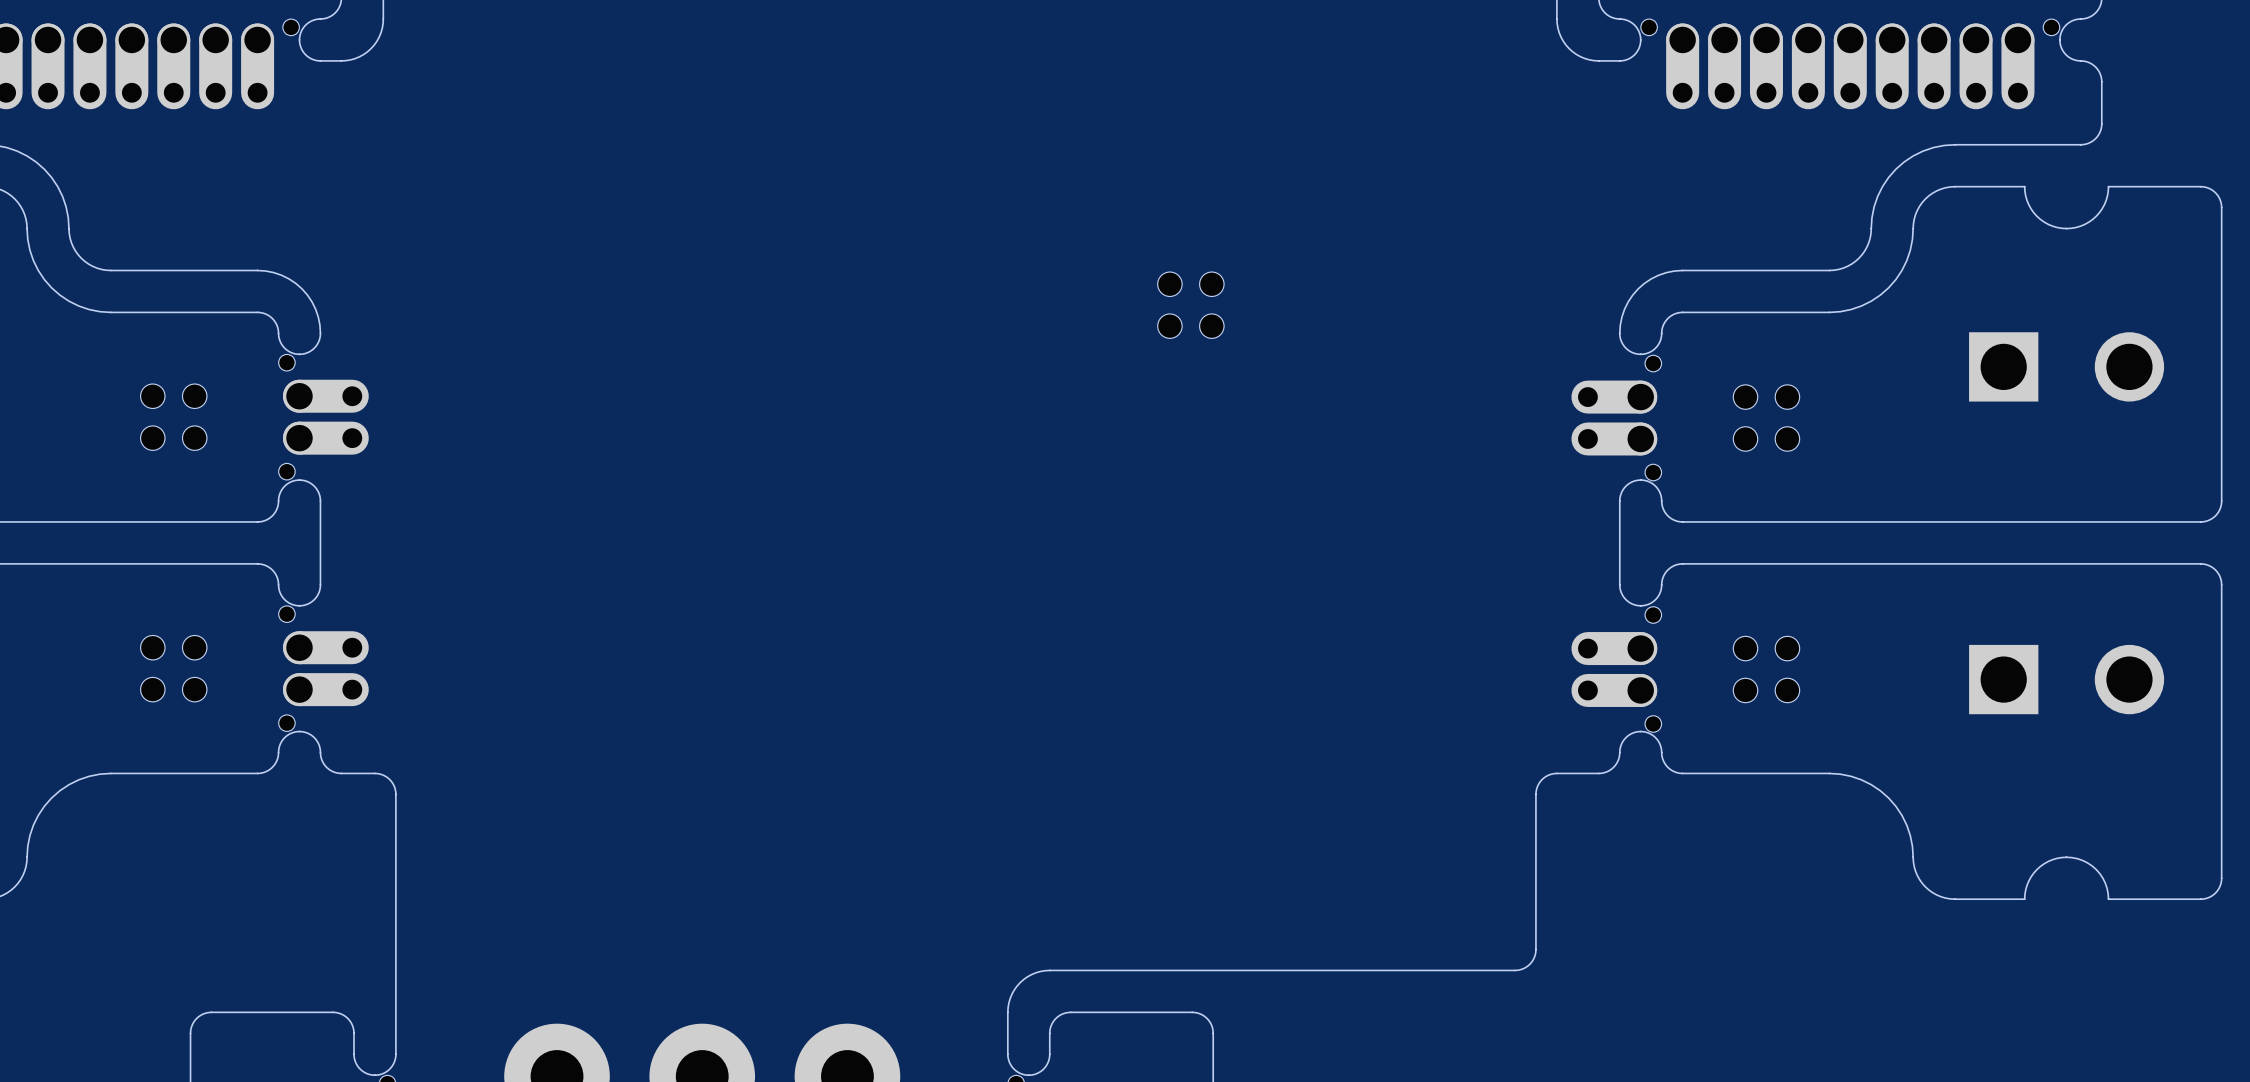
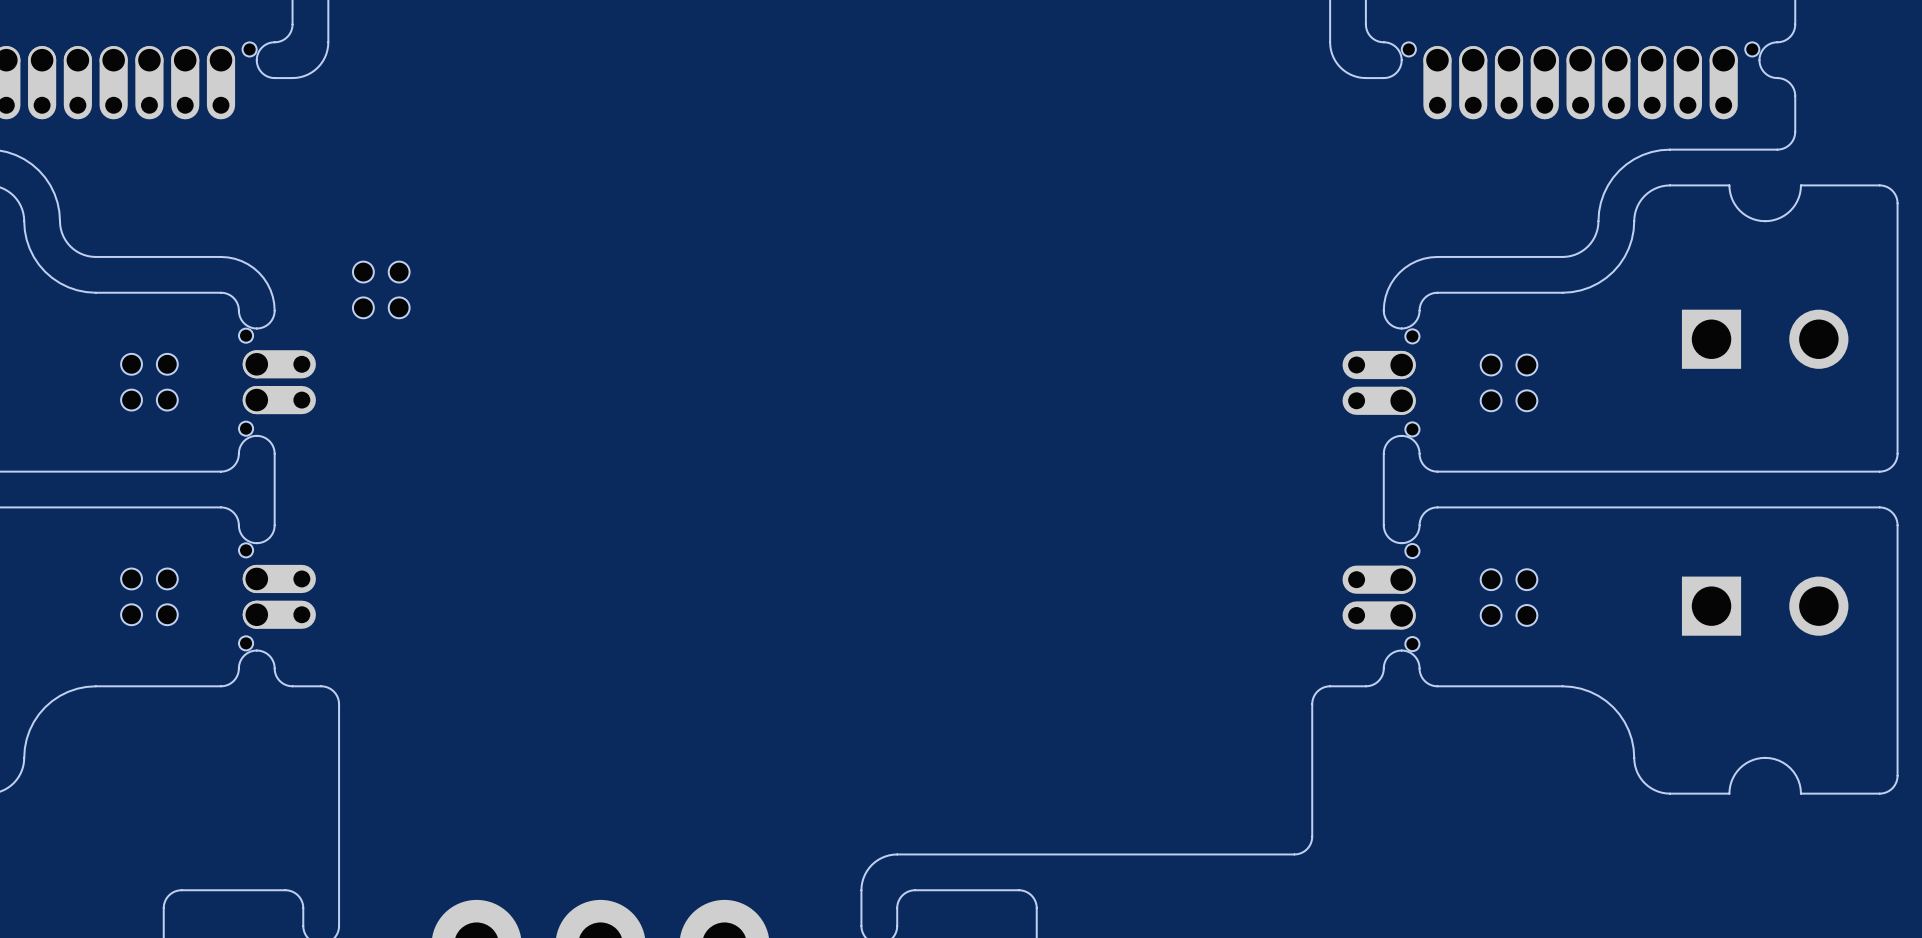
part position: (1190, 305) -> (381, 289)

